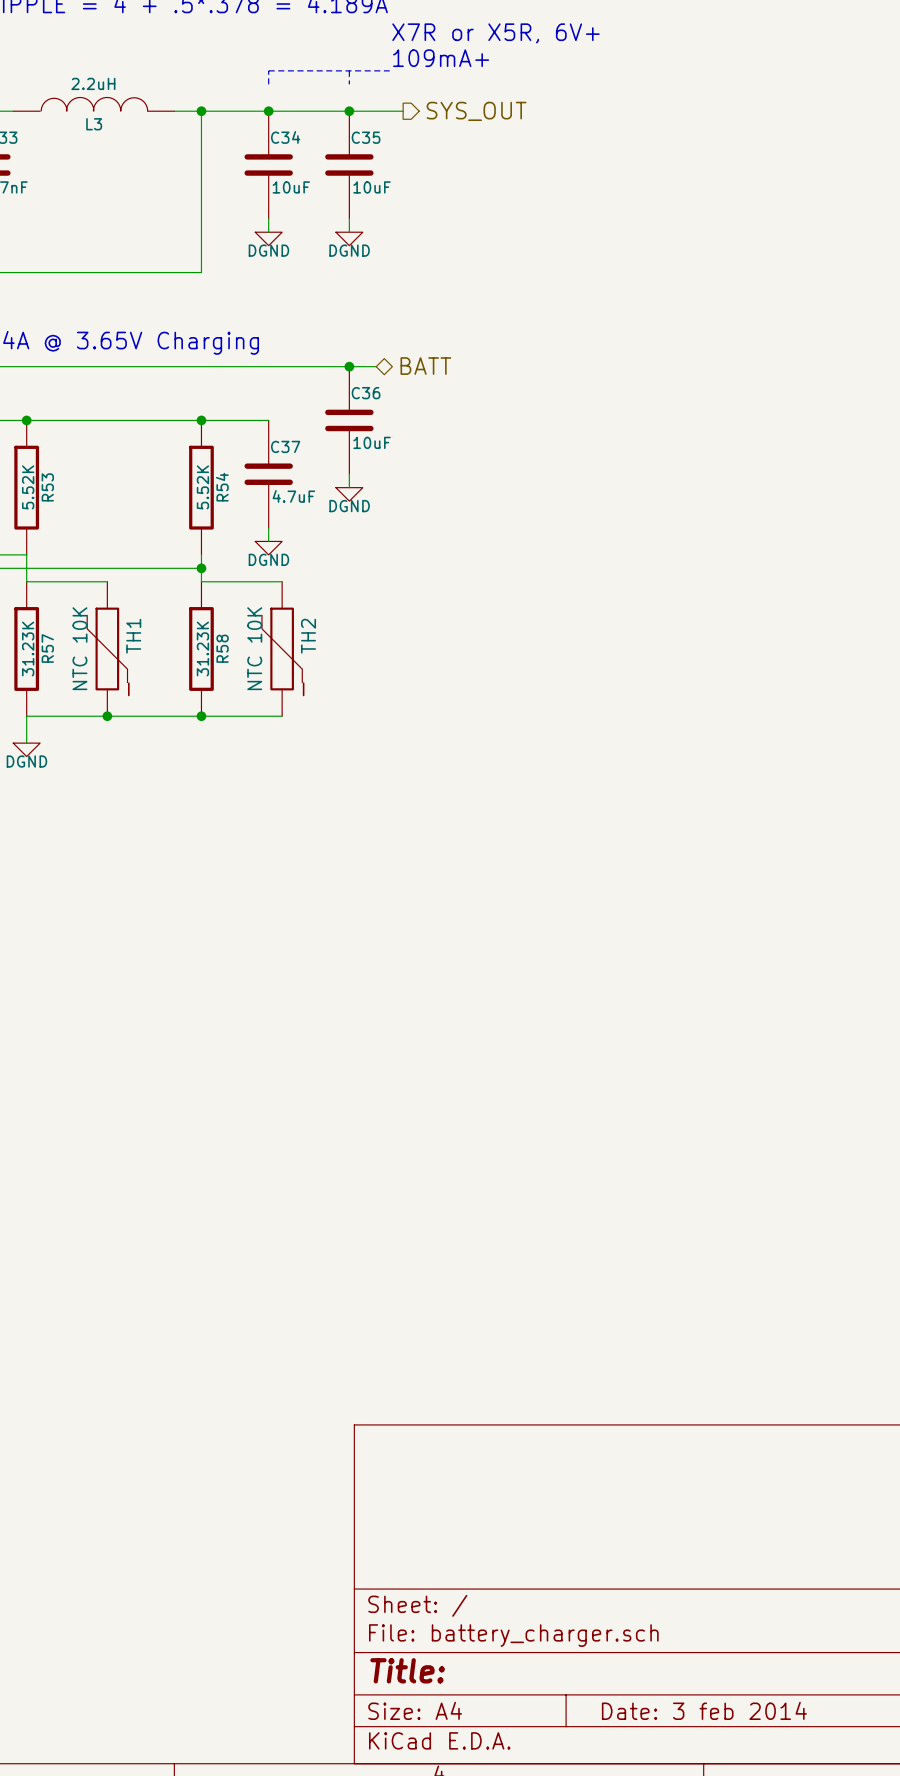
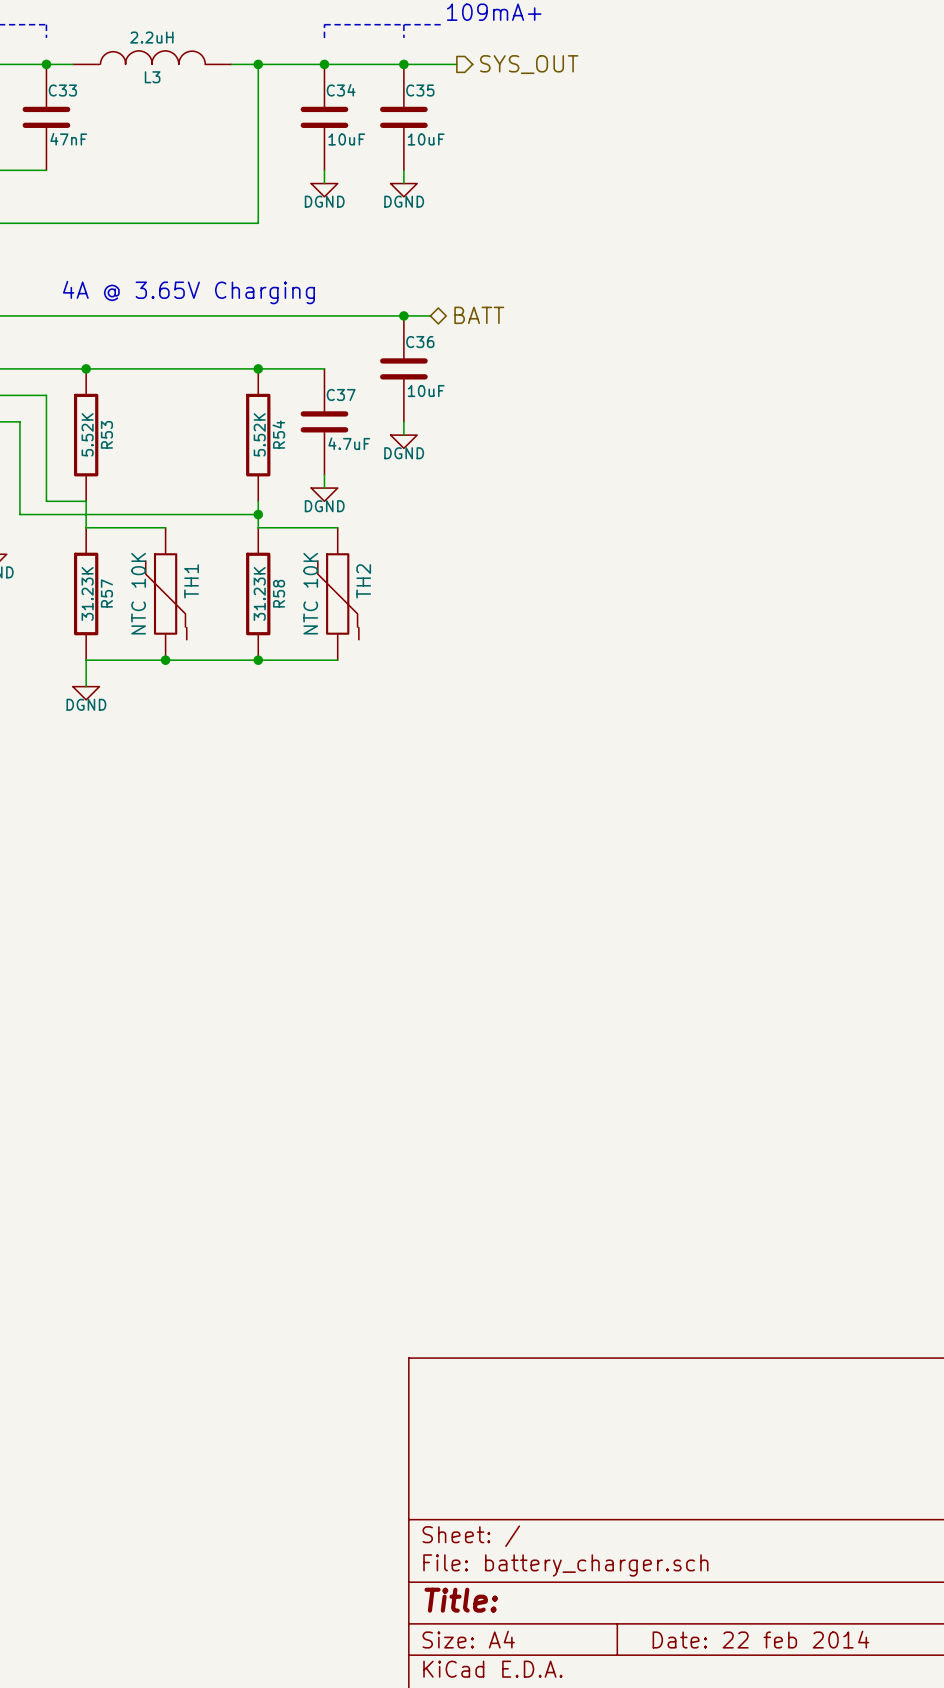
title block: Date: 3 feb 2014 (704, 1710) -> Date: 22 feb 2014 (760, 1639)

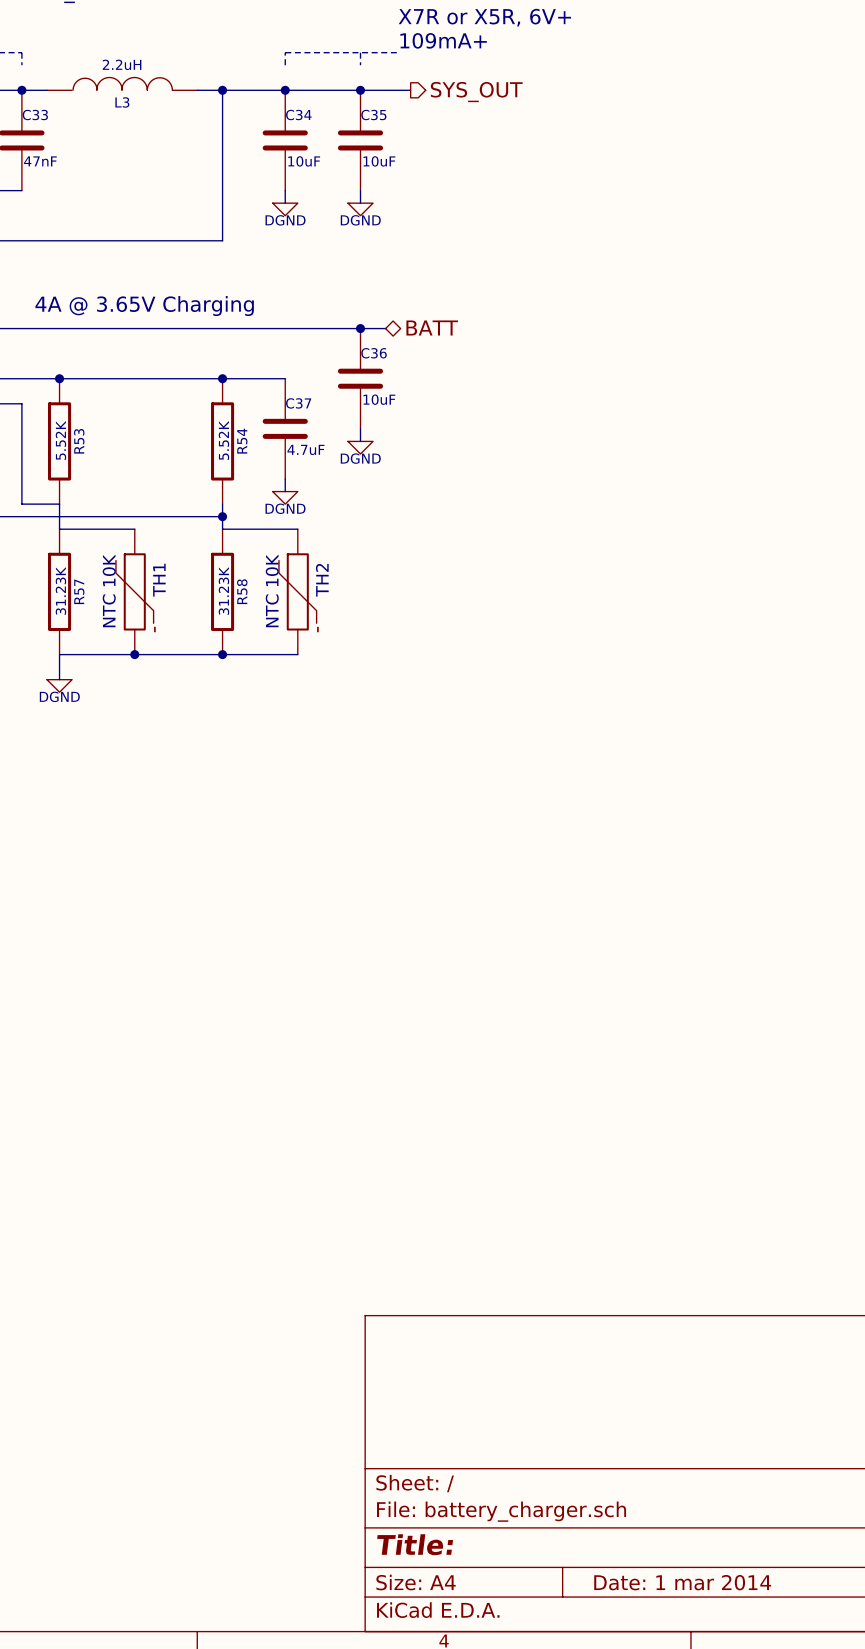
title block: Date: 22 feb 2014 (760, 1639) -> Date: 1 mar 2014 (682, 1582)

